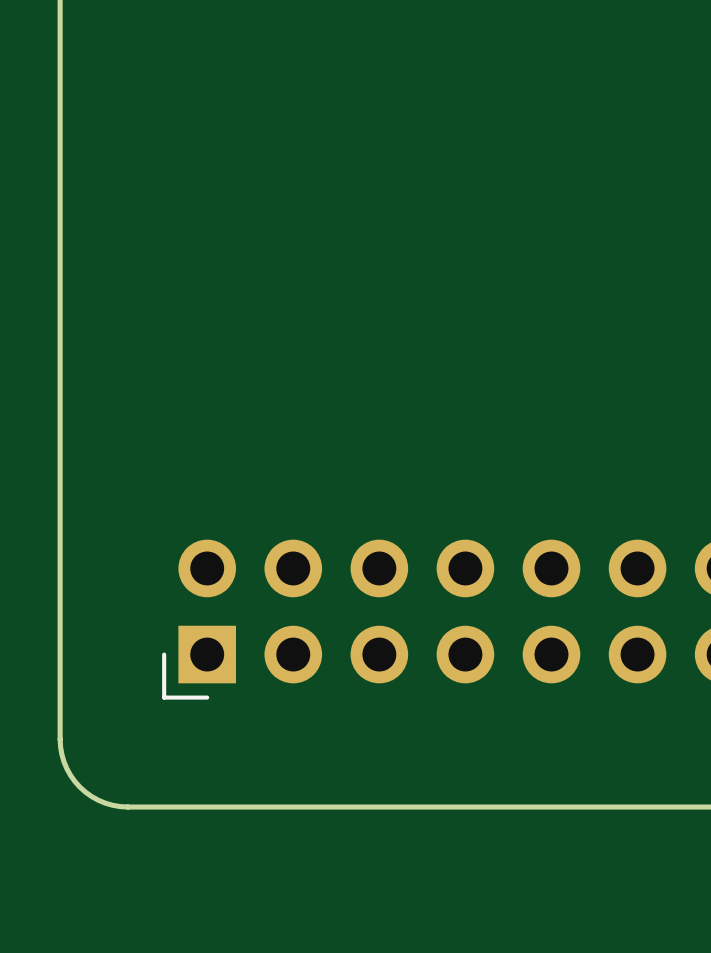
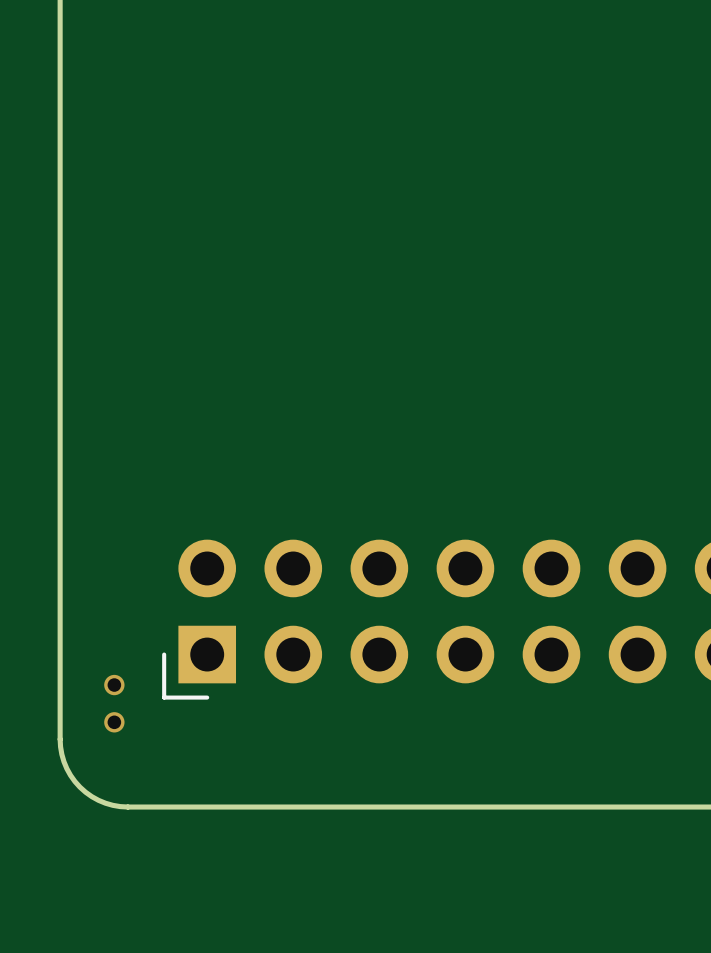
via: none -> (114, 685)
via: none -> (114, 722)

